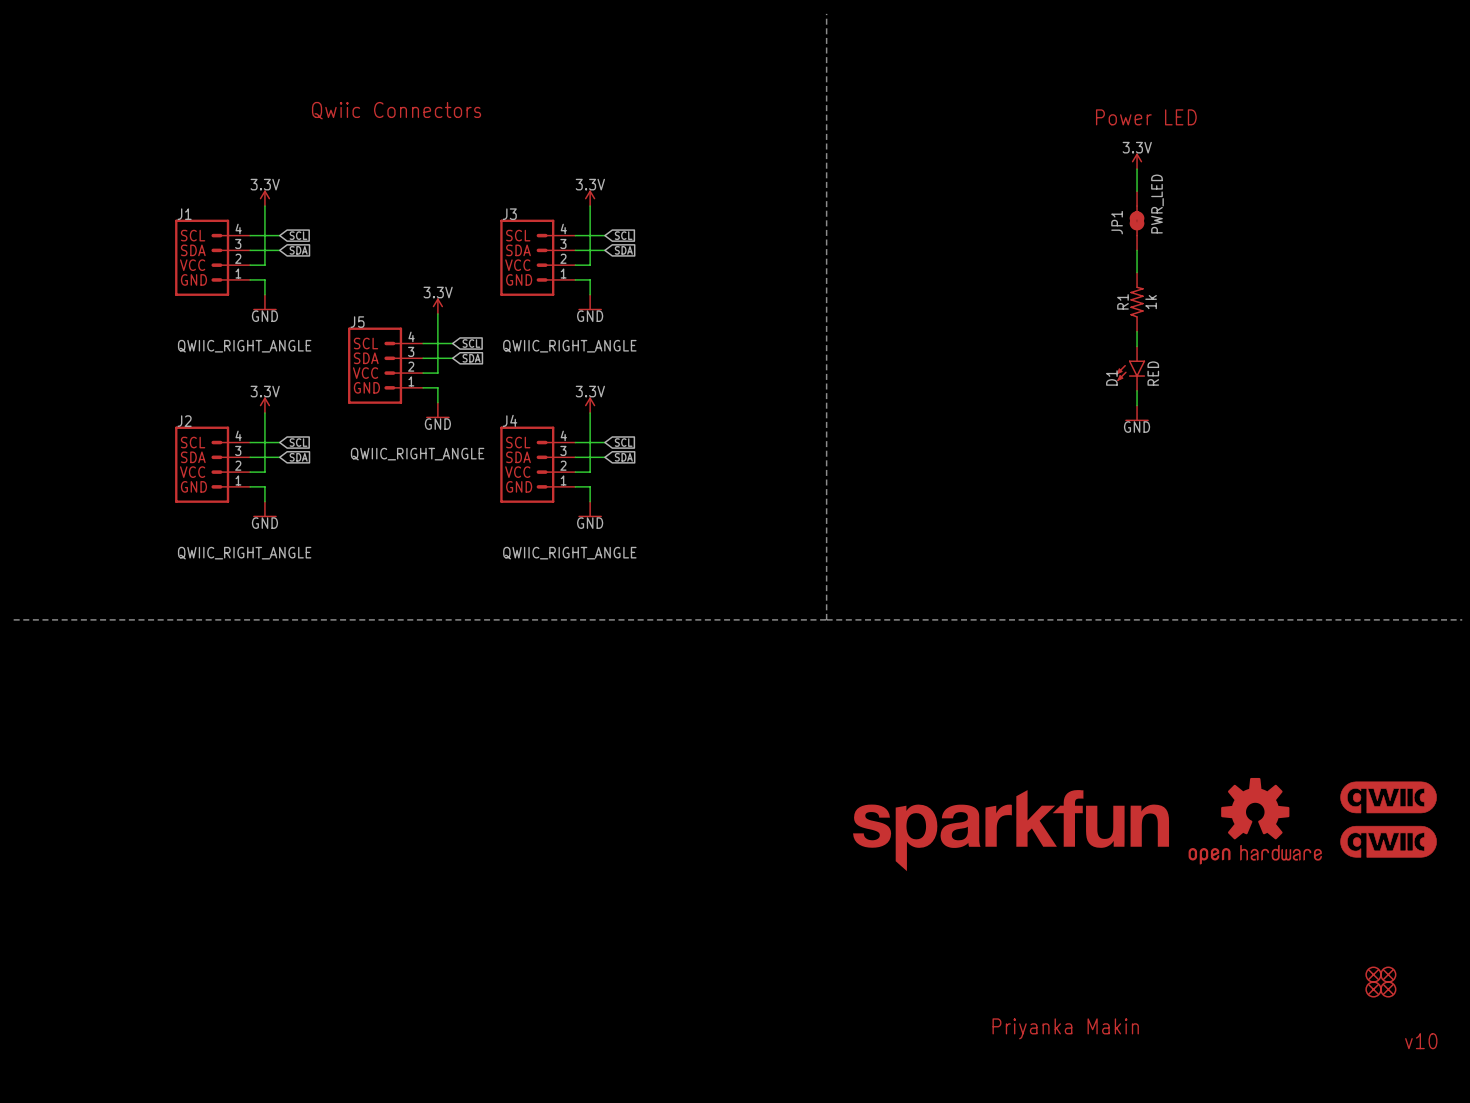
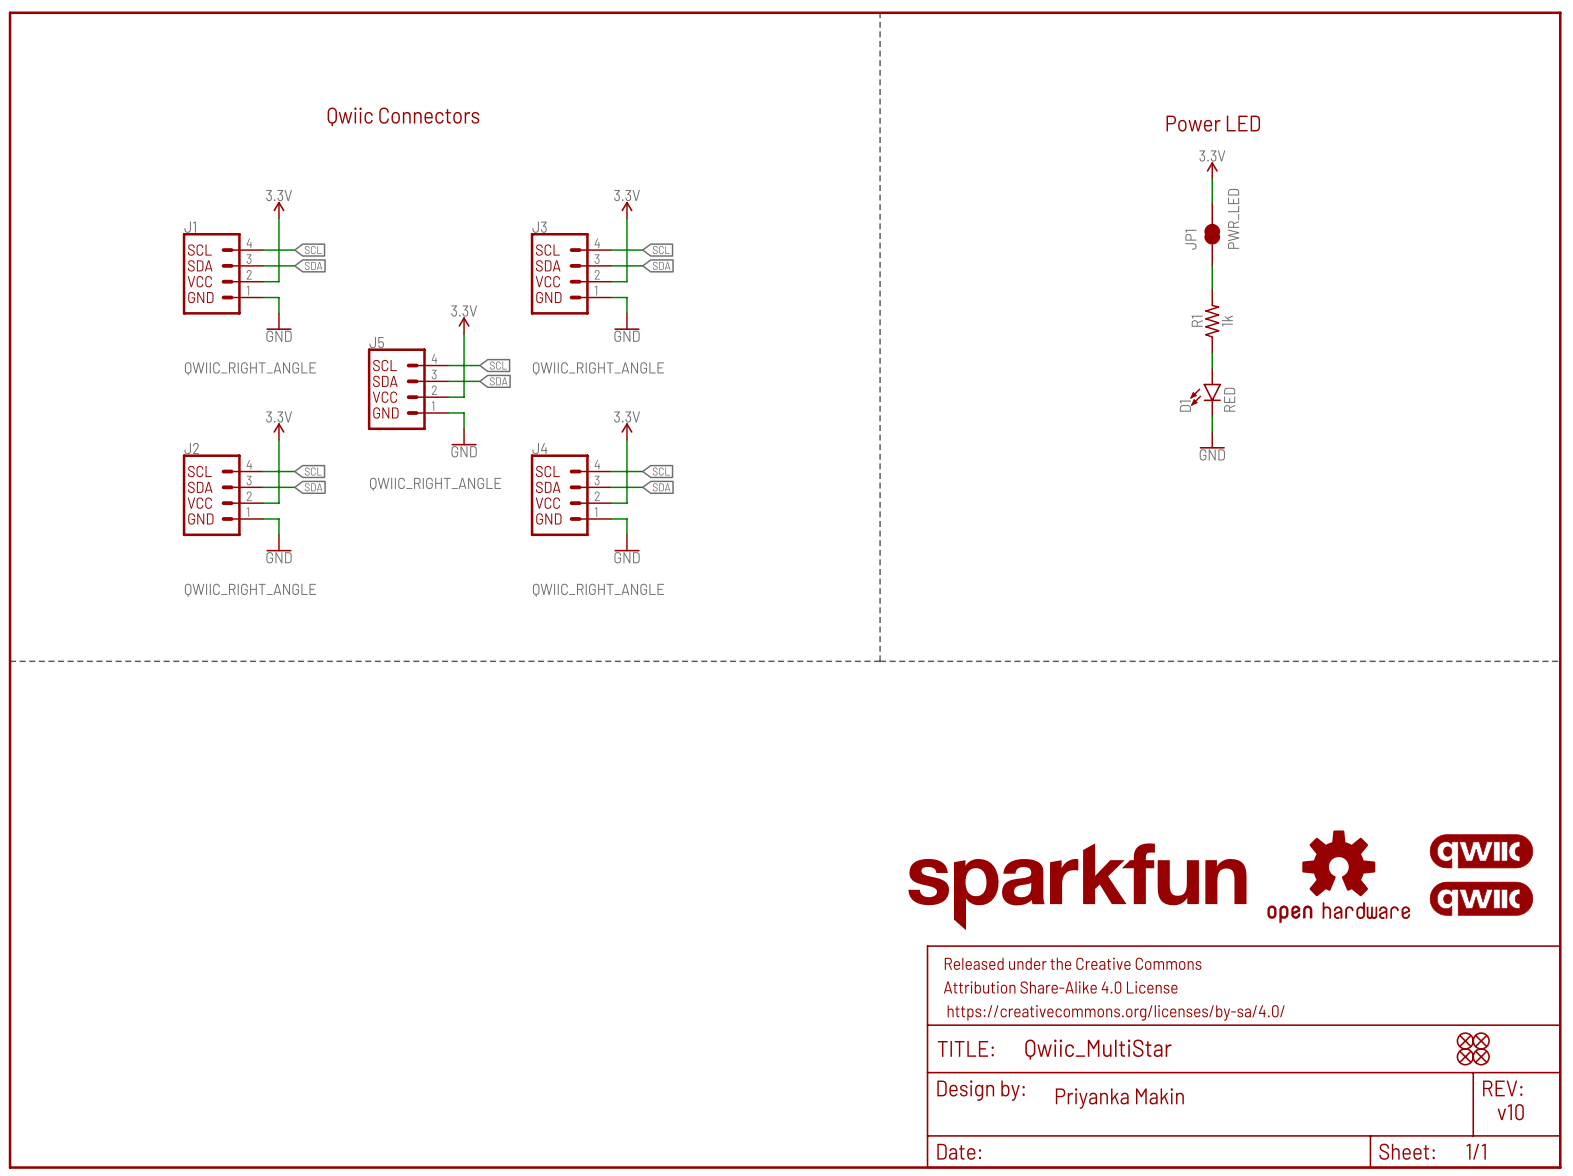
part: none -> (785, 590)
part: none -> (1243, 1056)

